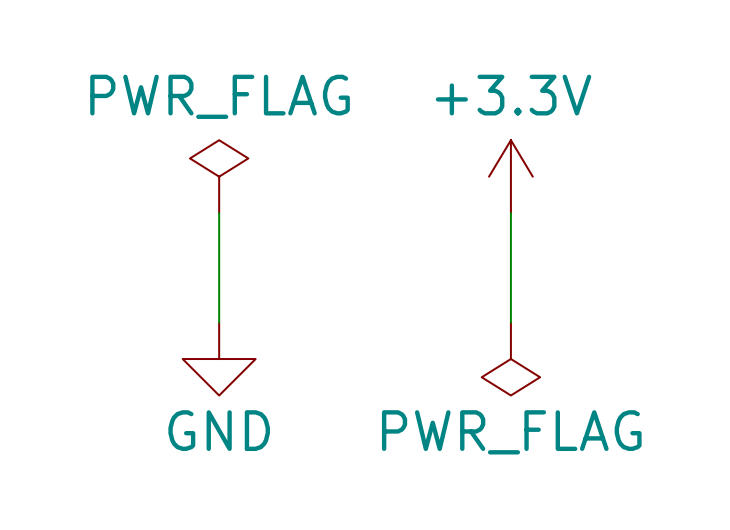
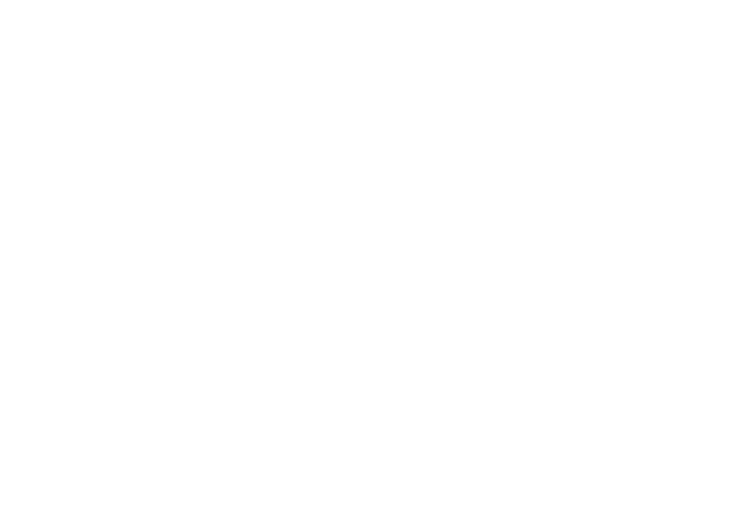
power symbol: PWR_FLAG (219, 176) -> none
power symbol: +3.3V (510, 176) -> none
wire: (219, 213) (219, 322) -> none
wire: (510, 213) (510, 322) -> none
power symbol: GND (219, 359) -> none
power symbol: PWR_FLAG (510, 359) -> none

